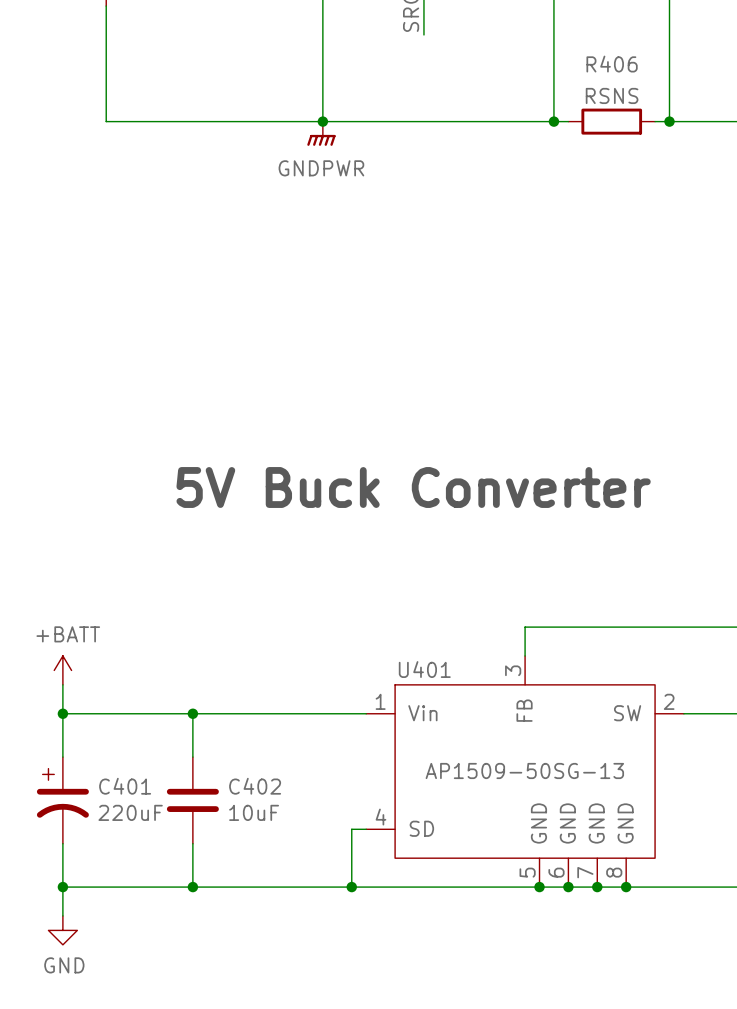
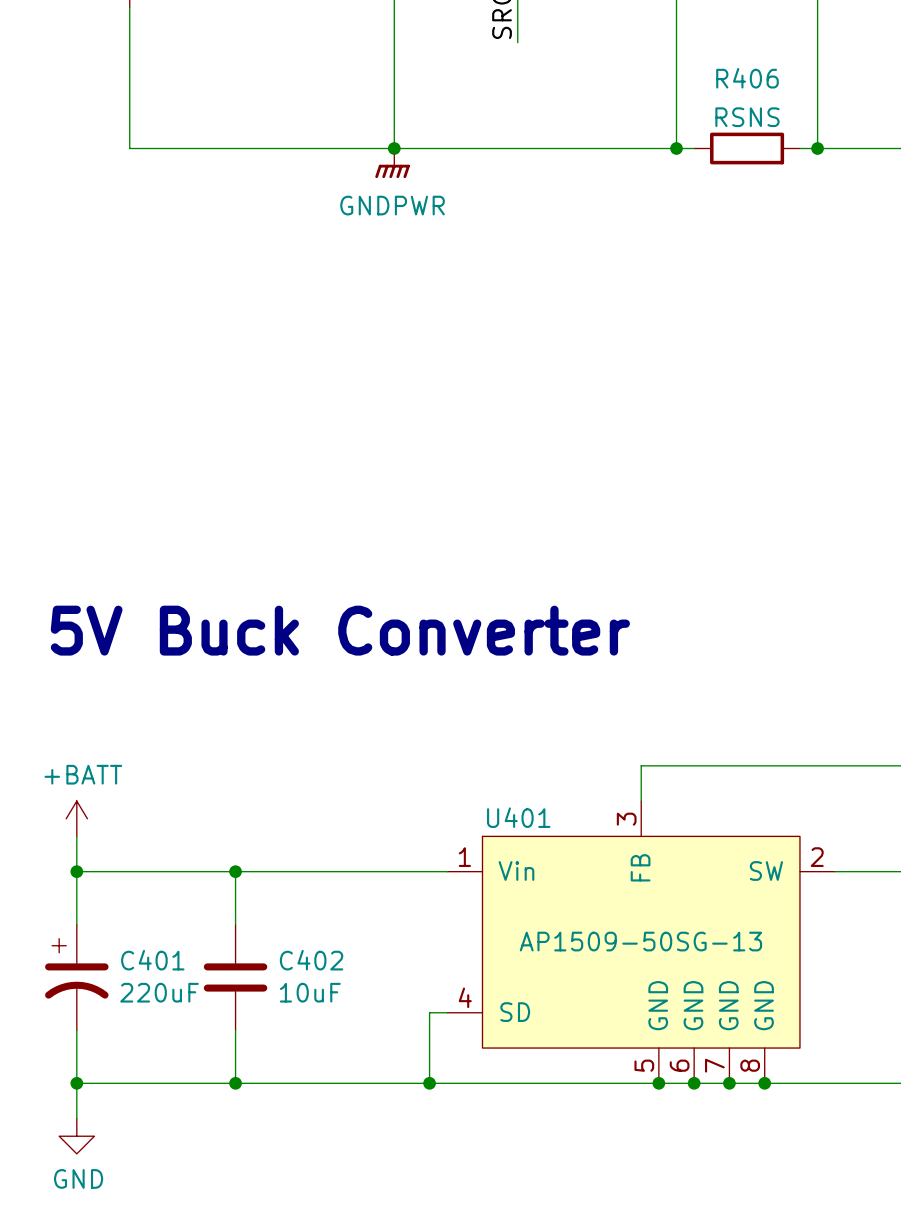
text: 5V Buck Converter (413, 487) -> none
text: none -> 5V Buck Converter (340, 630)

